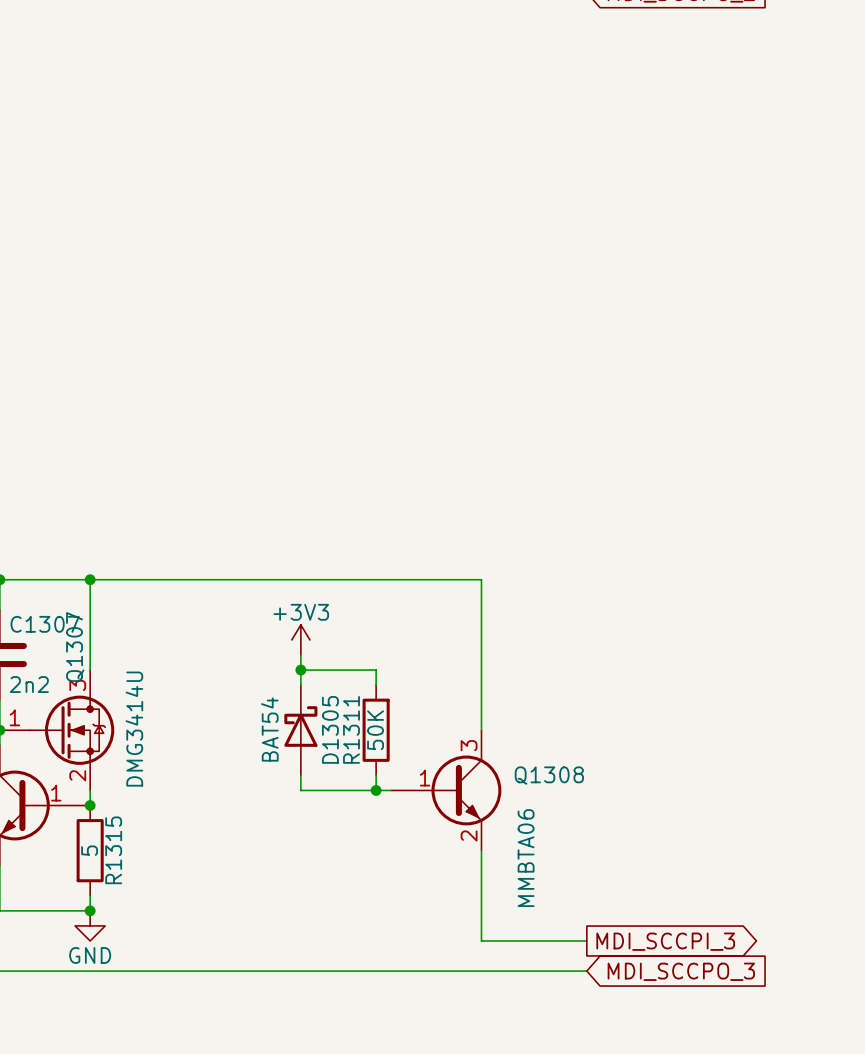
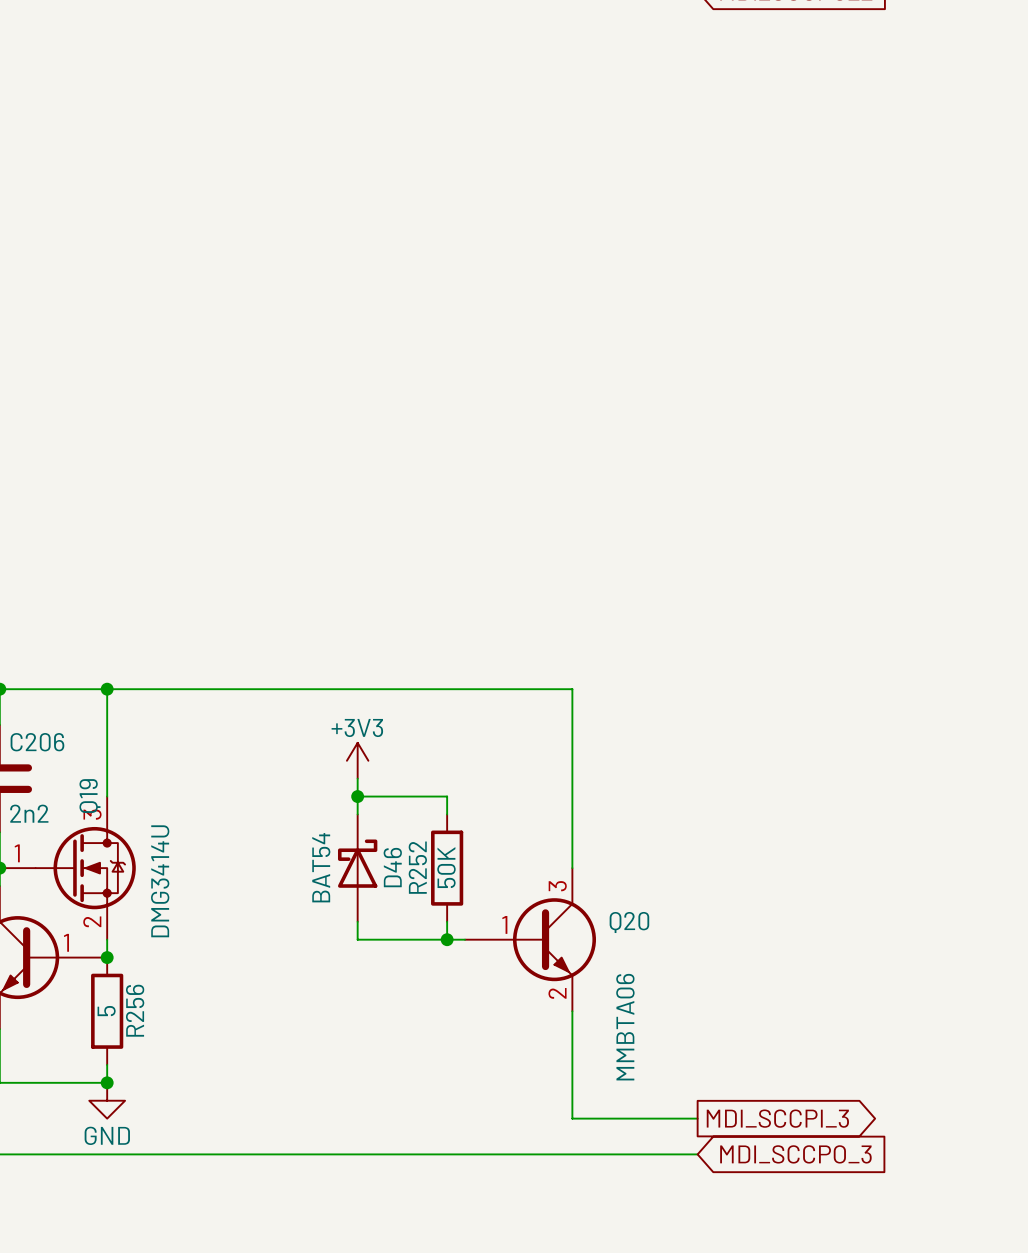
C1307 name: C1307 (45, 624) -> C206 (37, 742)
Q1307 name: Q1307 (75, 647) -> Q19 (89, 796)
D1305 name: D1305 (330, 729) -> D46 (392, 867)
R1311 name: R1311 (351, 729) -> R252 (417, 867)
Q1308 name: Q1308 (549, 775) -> Q20 (629, 922)
R1315 name: R1315 (113, 850) -> R256 (135, 1010)

